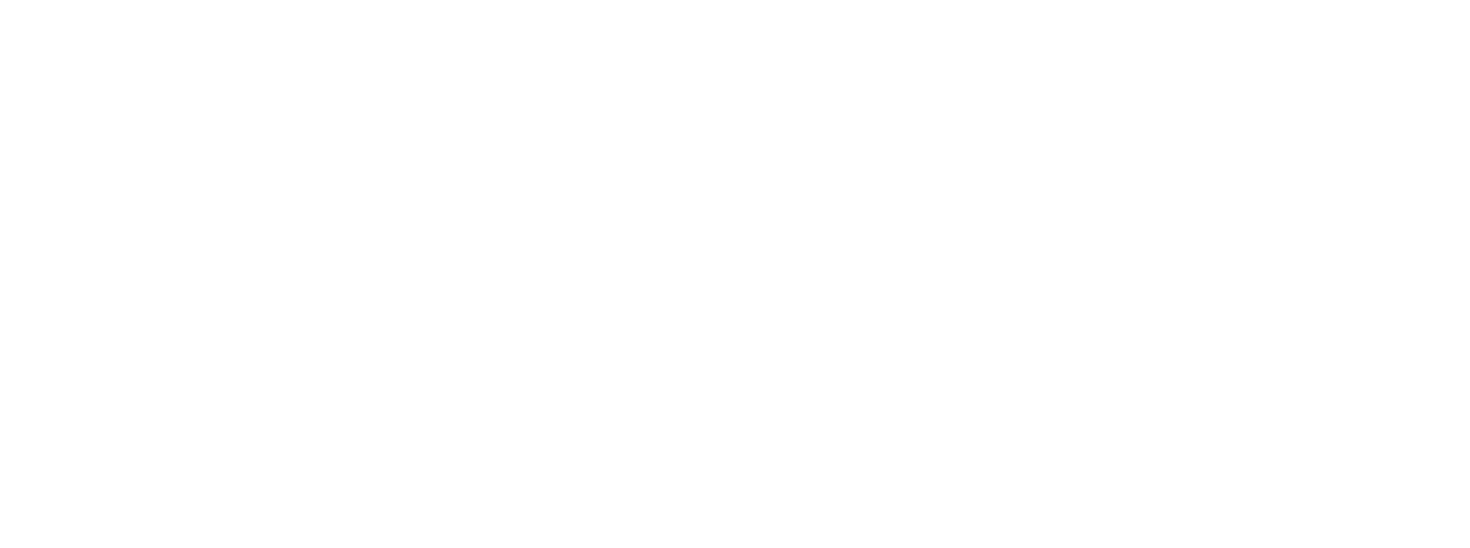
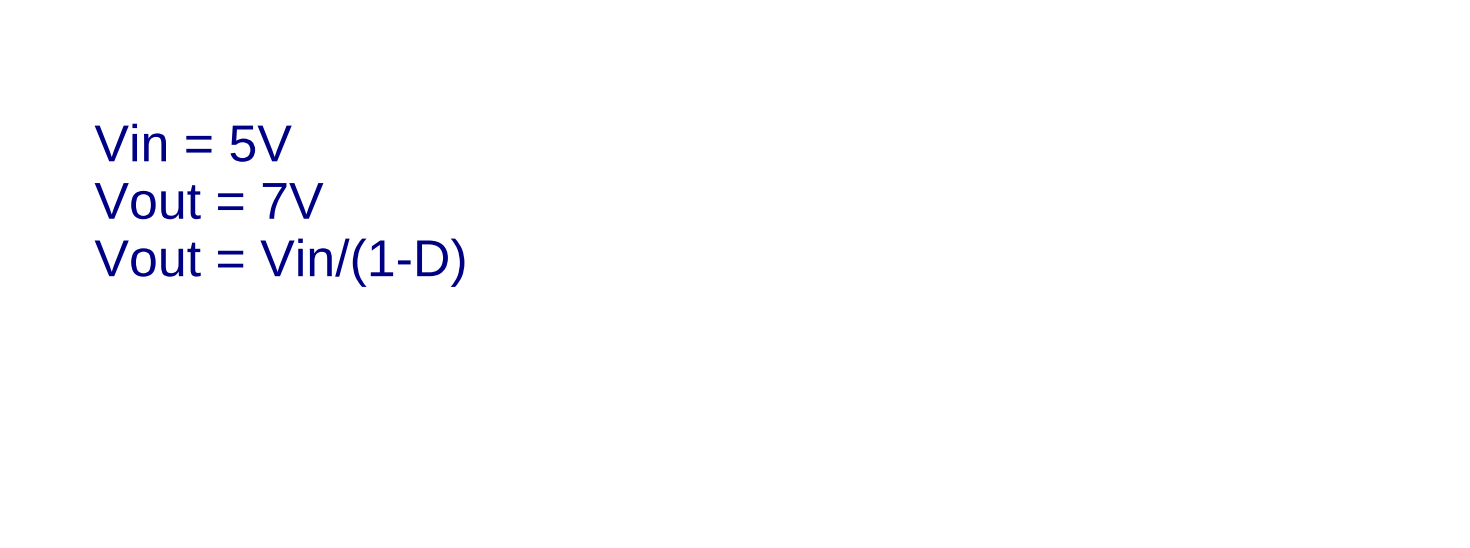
text: none -> Vin = 5V (193, 142)
text: none -> Vout = 7V (209, 201)
text: none -> Vout = Vin/(1-D) (279, 262)

